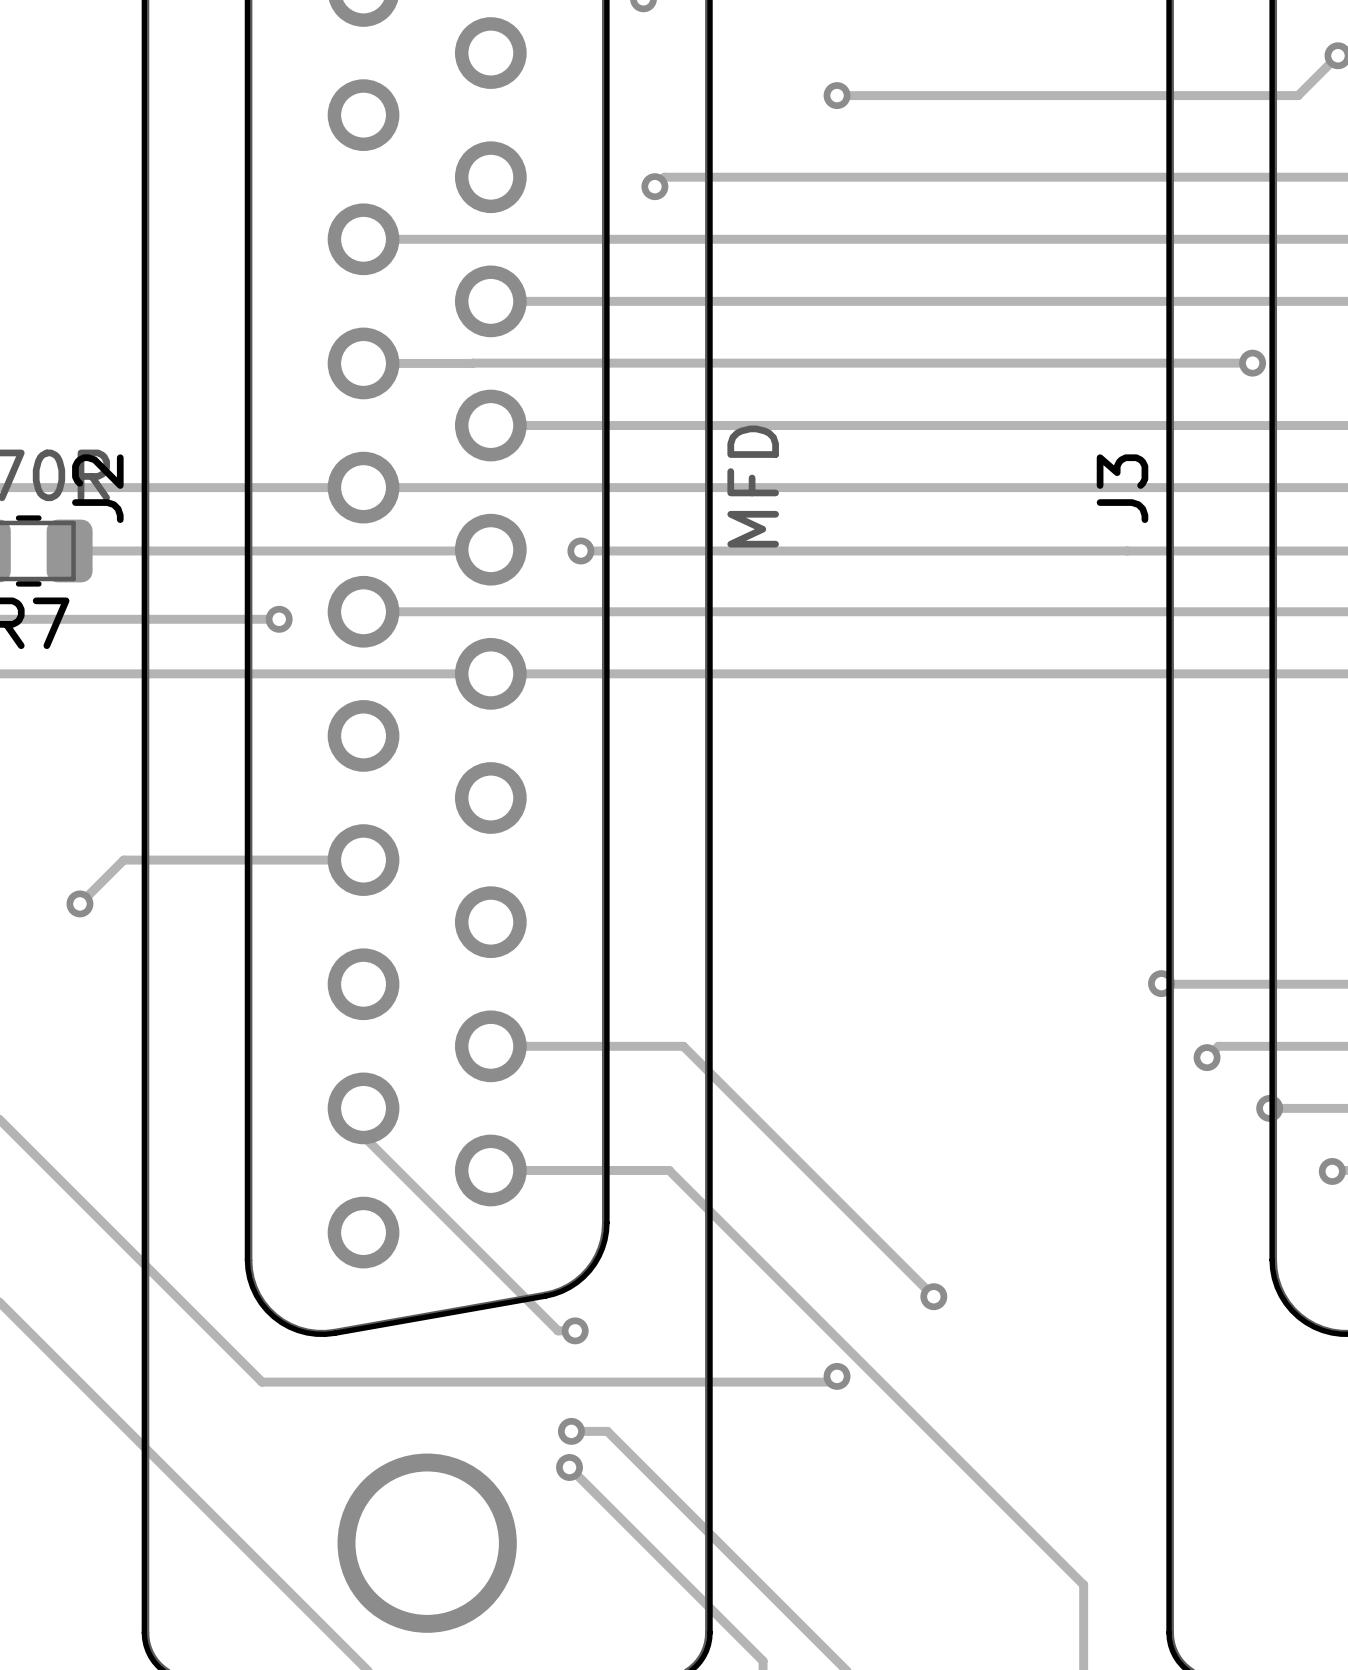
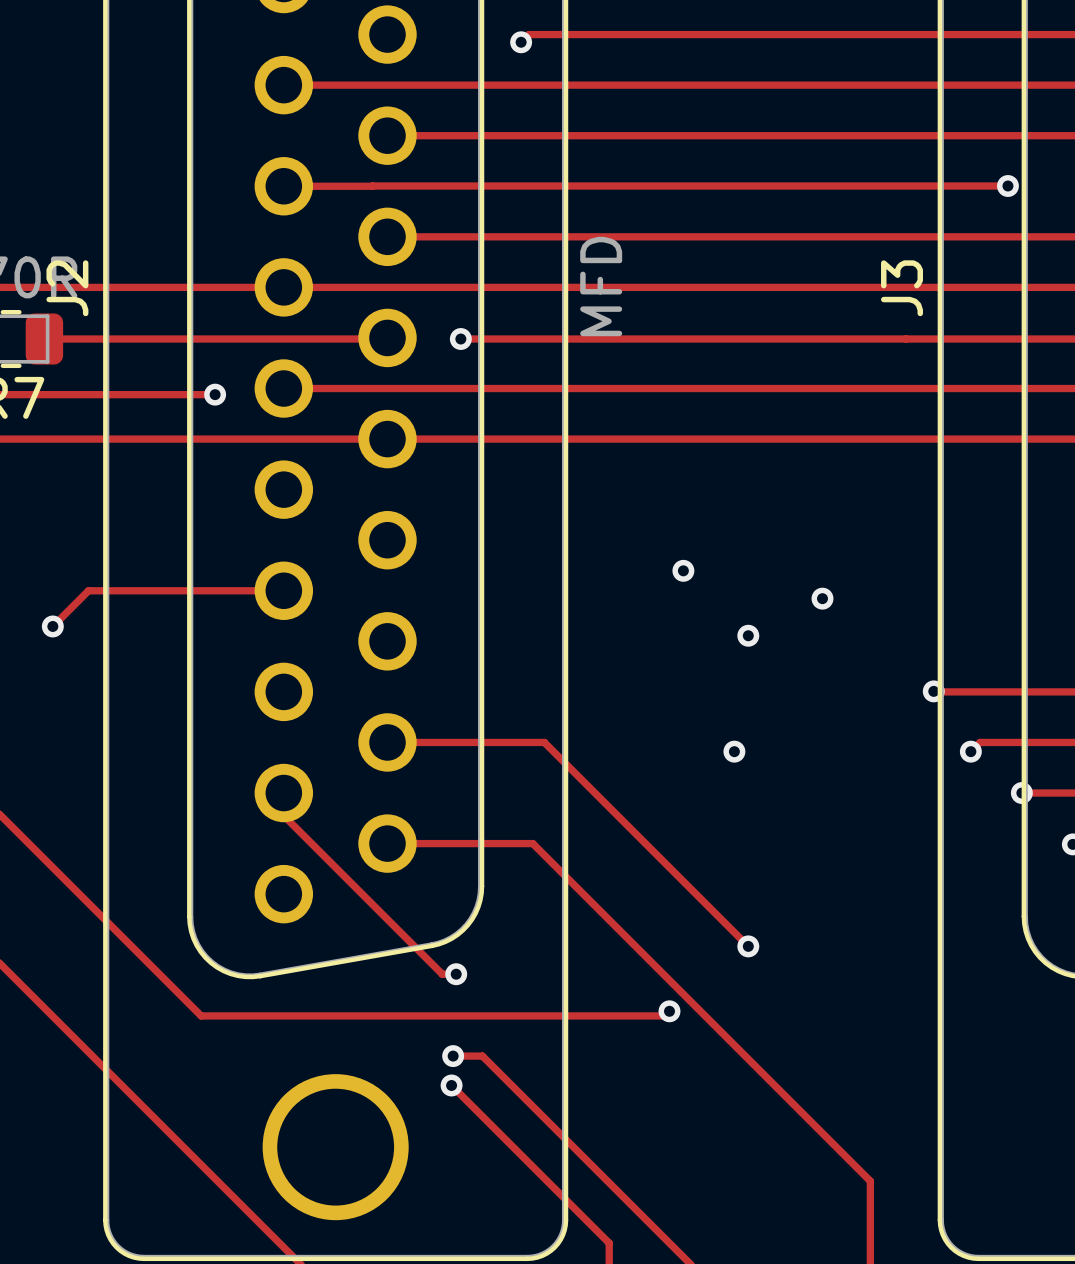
via: none -> (683, 570)
via: none -> (822, 598)
via: none -> (748, 635)
via: none -> (734, 751)

